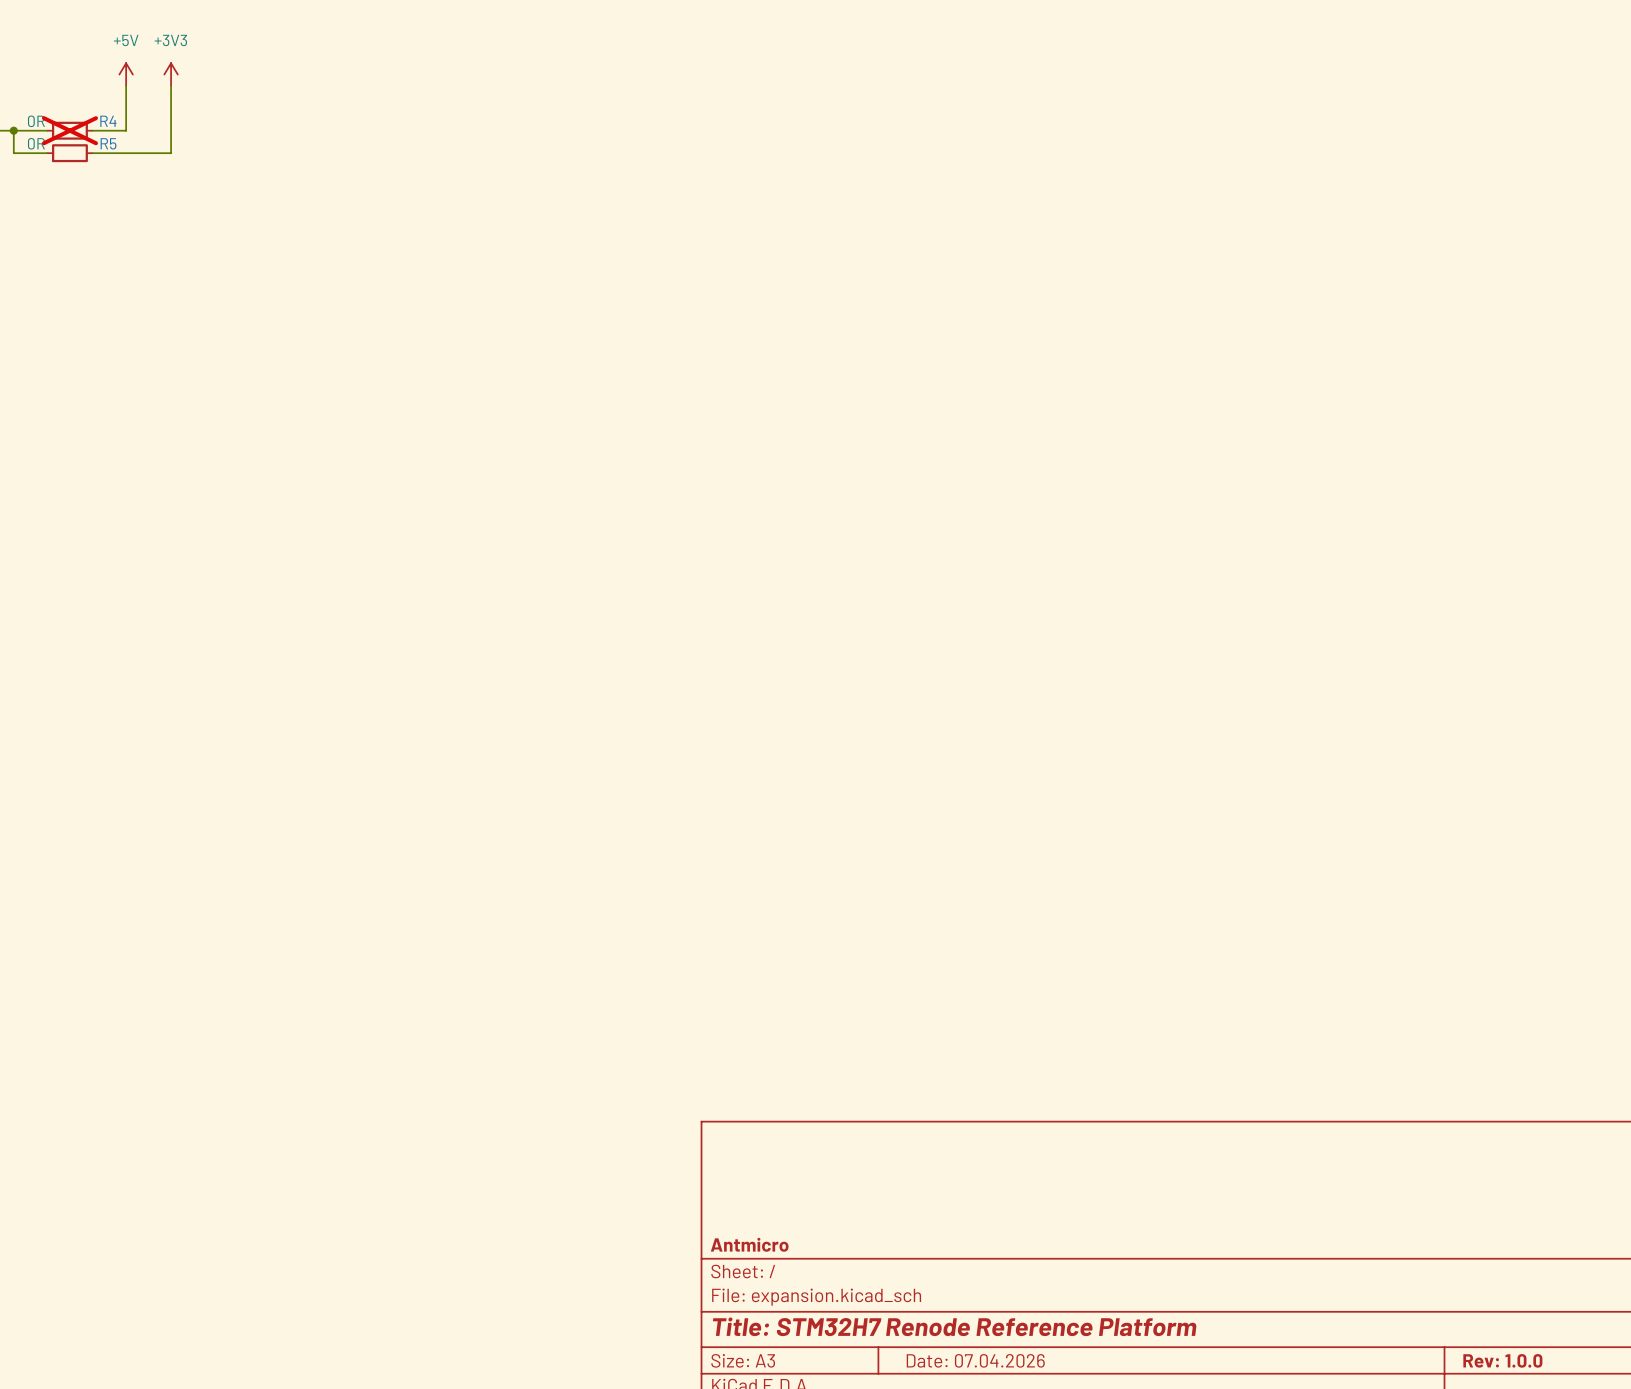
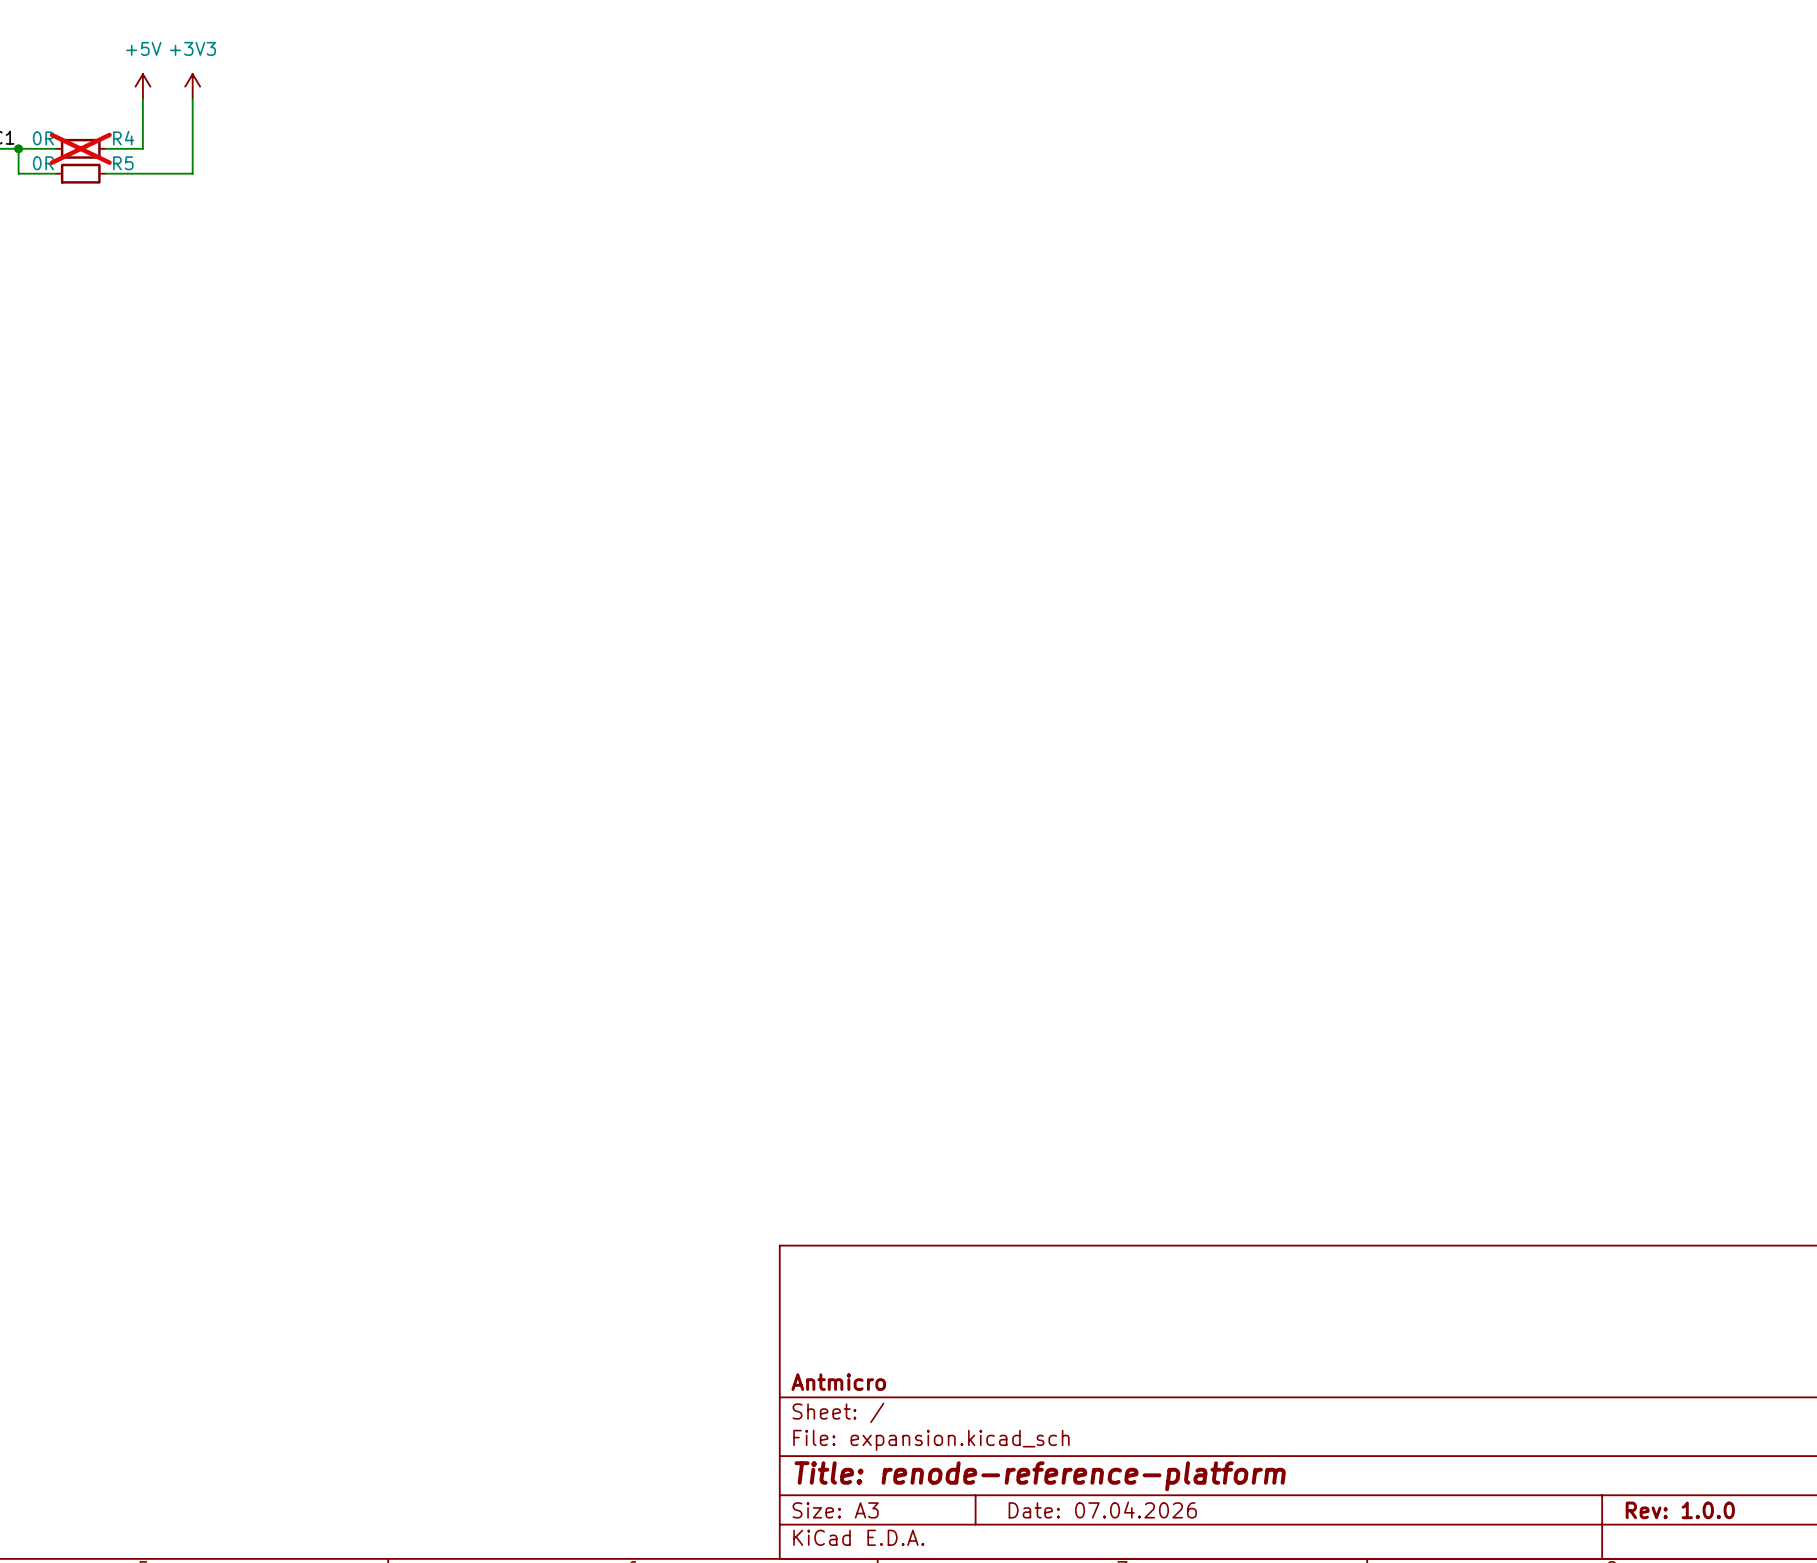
title block: Title: STM32H7 Renode Reference Platform (954, 1326) -> Title: renode-reference-platform (1040, 1476)

